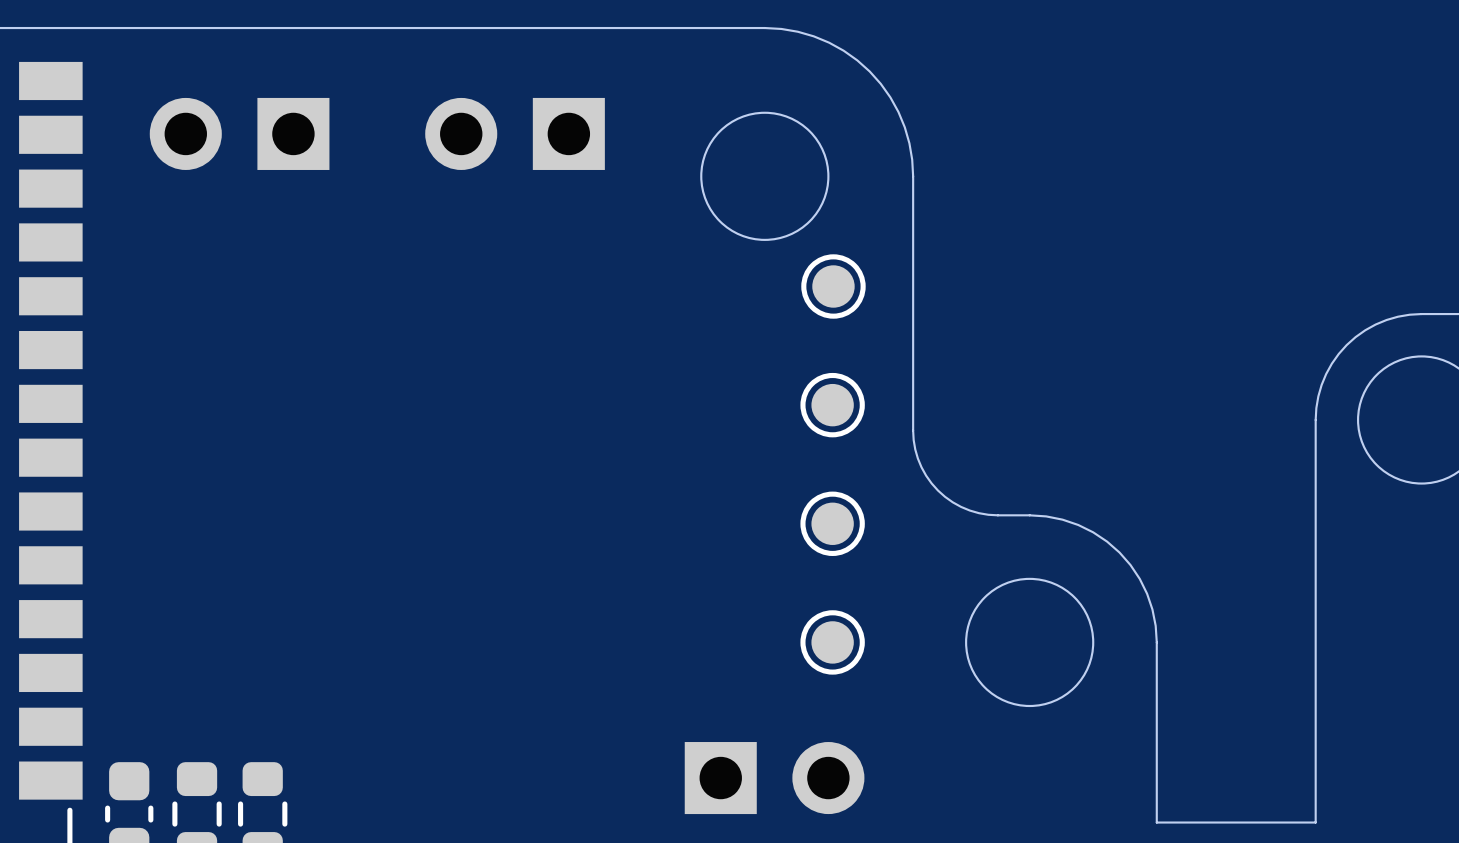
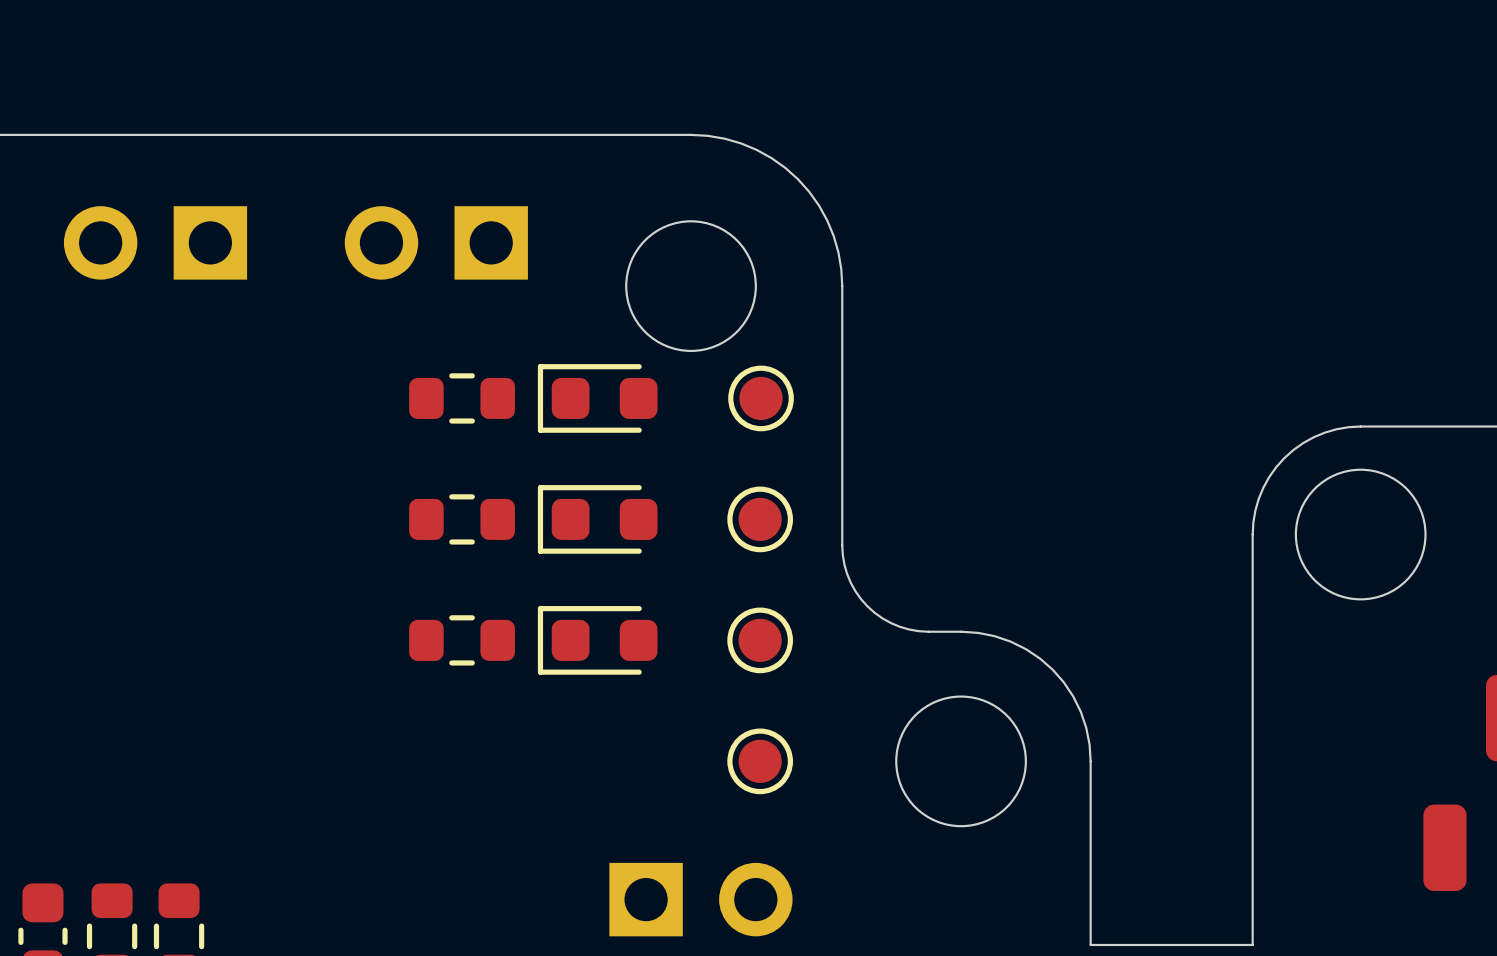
part: none -> (462, 398)
part: none -> (597, 398)
part: none -> (462, 519)
part: none -> (597, 519)
part: none -> (462, 640)
part: none -> (597, 640)

